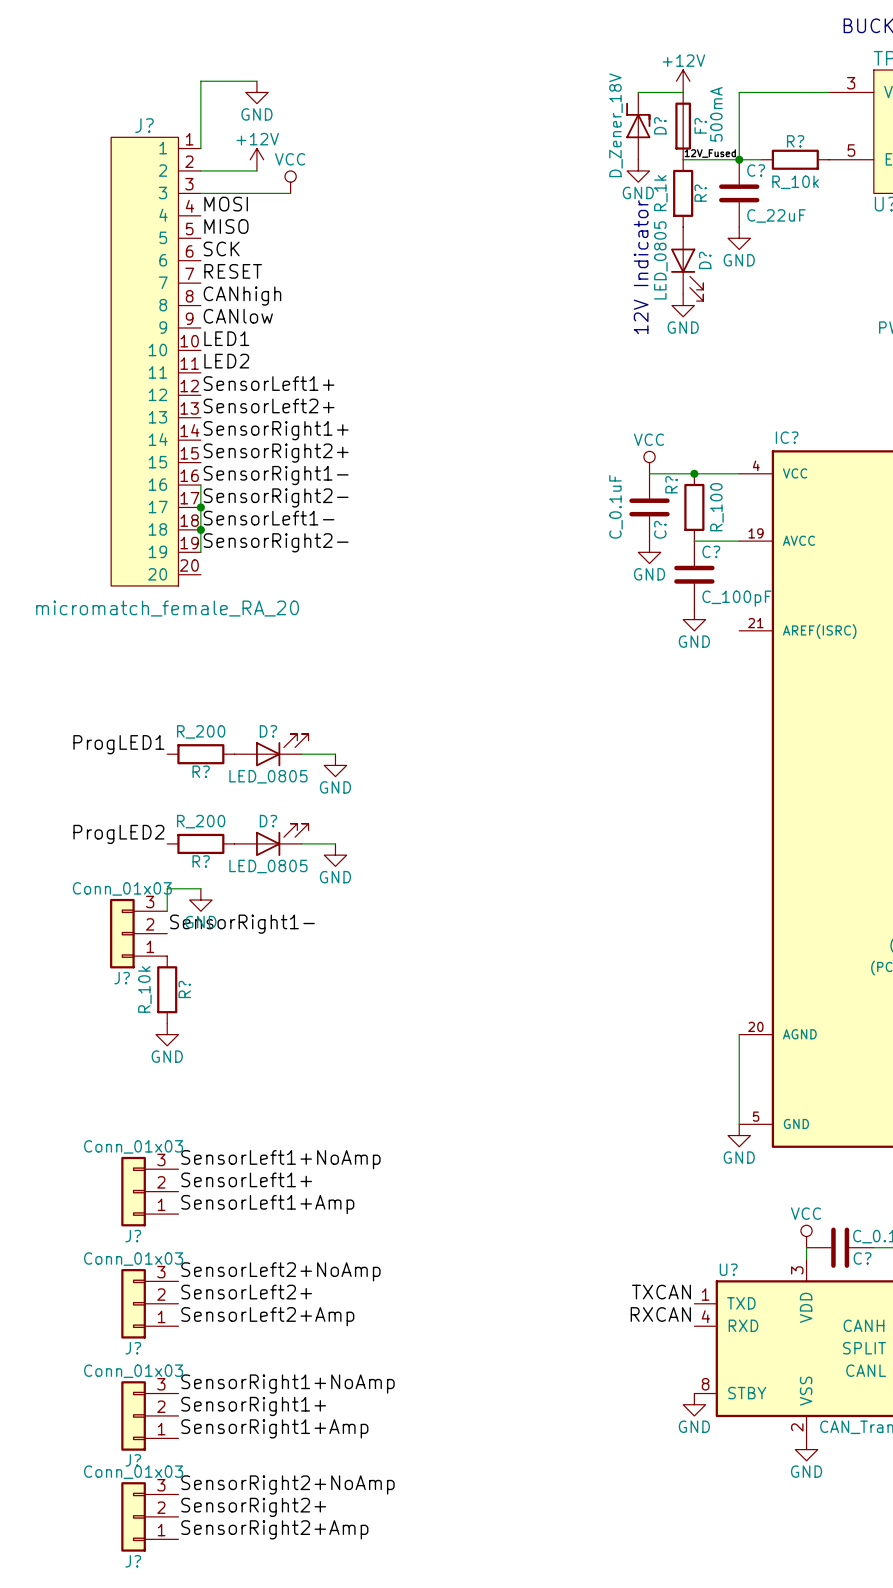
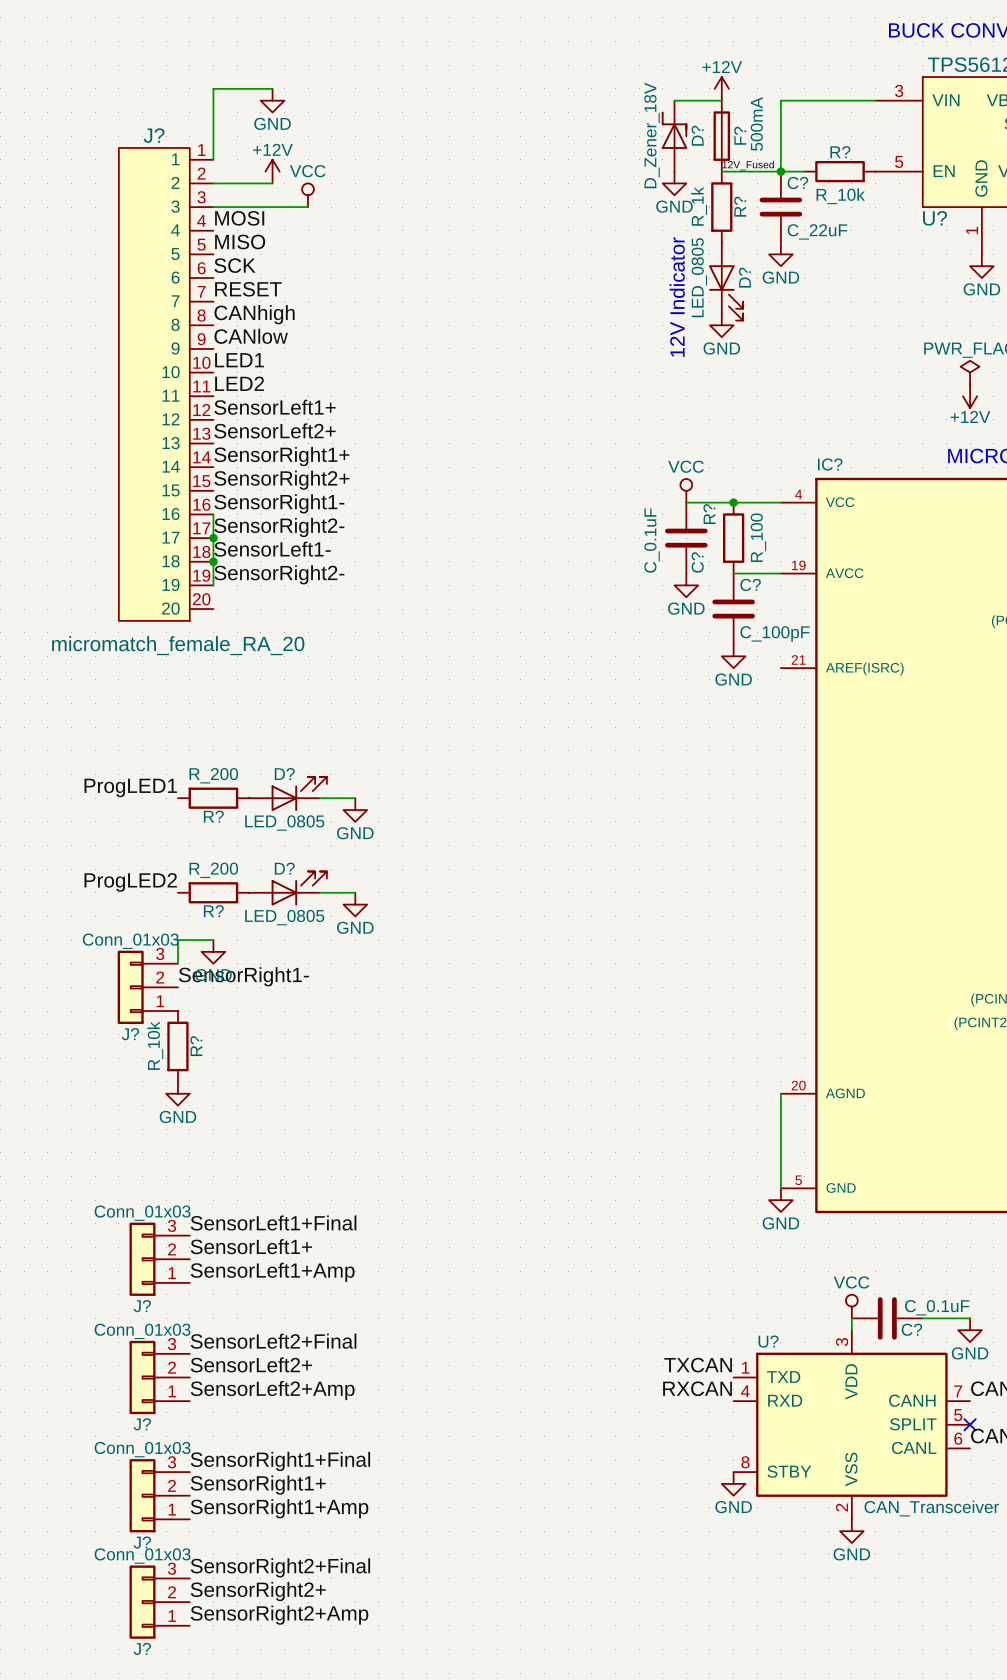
label: SensorLeft1+NoAmp (280, 1159) -> SensorLeft1+Final (273, 1222)
label: SensorLeft2+NoAmp (280, 1271) -> SensorLeft2+Final (273, 1341)
label: SensorRight1+NoAmp (287, 1384) -> SensorRight1+Final (280, 1461)
label: SensorRight2+NoAmp (287, 1484) -> SensorRight2+Final (280, 1567)

